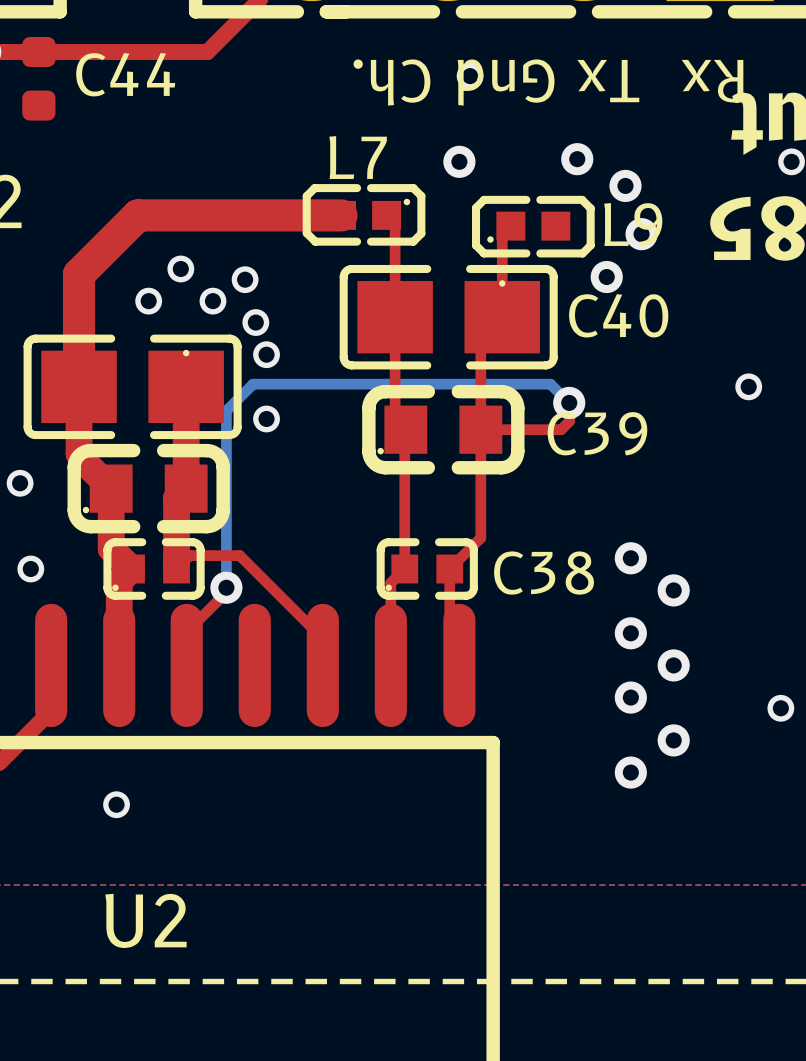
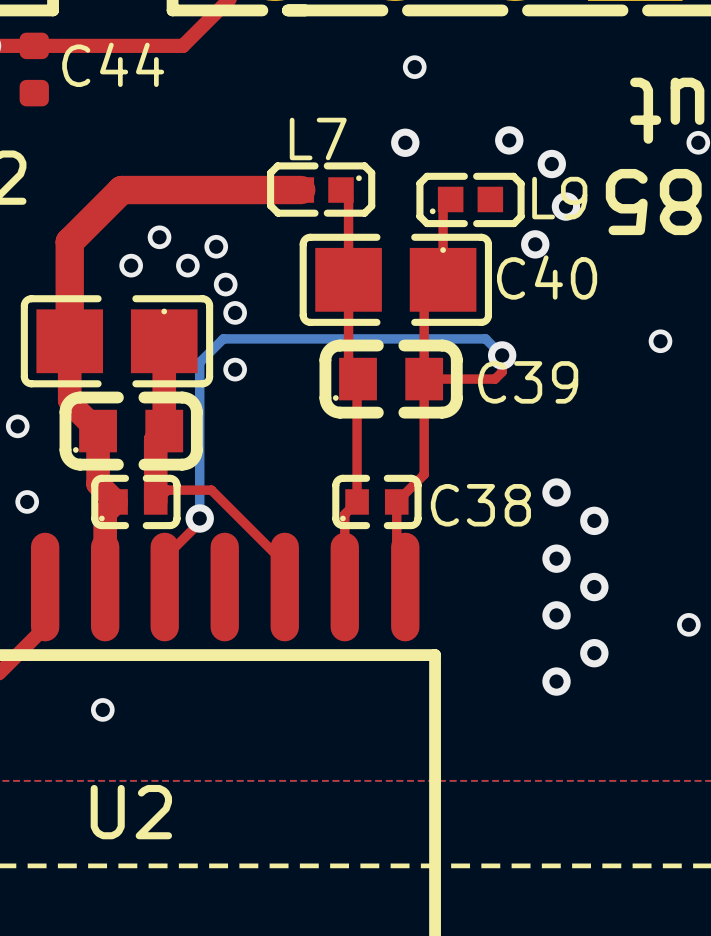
text: Rx Tx Gnd Ch. (548, 82) -> none

